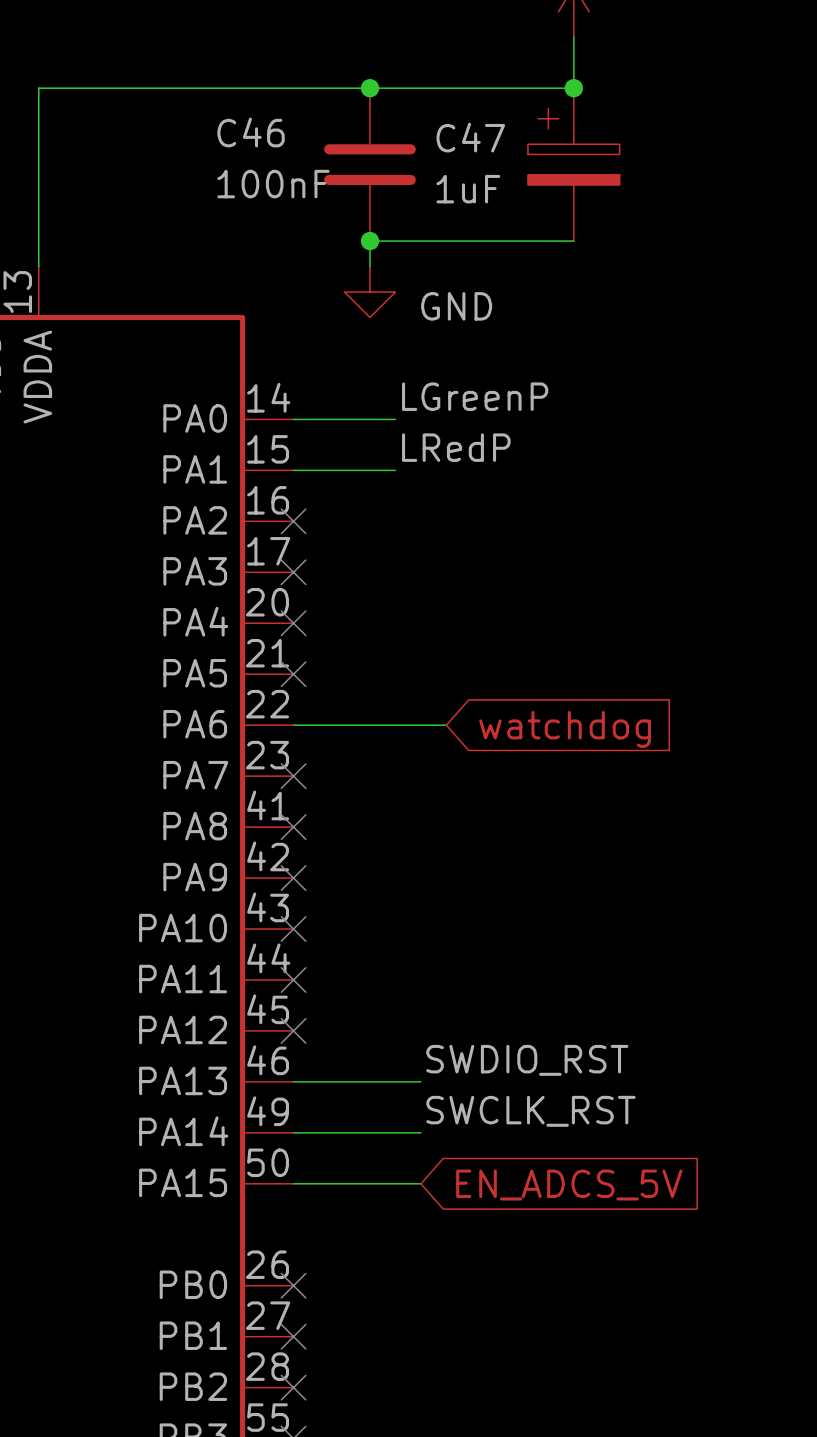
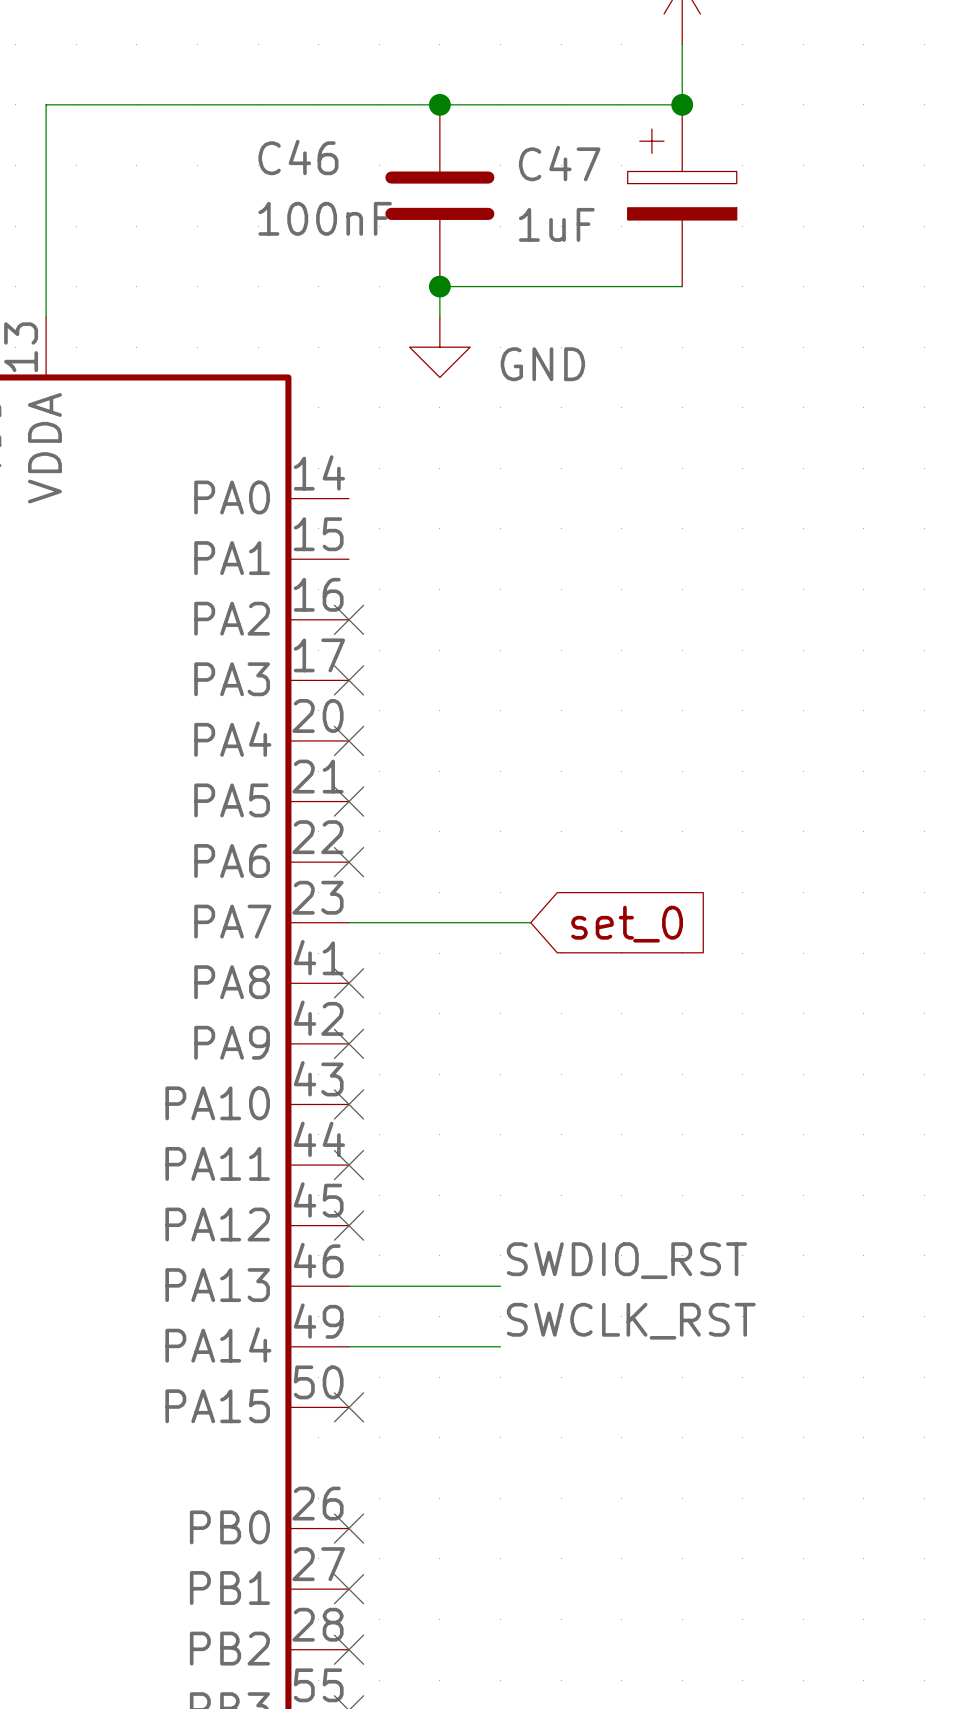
label: LGreenP (475, 396) -> none
wire: (293, 419) (395, 419) -> none
label: LRedP (456, 447) -> none
wire: (293, 470) (395, 470) -> none
wire: (293, 725) (446, 725) -> (349, 922) (530, 922)
global label: watchdog (565, 729) -> none
no-connect mark position: (293, 776) -> (349, 862)
global label: none -> set_0 (627, 924)
wire: (293, 1183) (420, 1183) -> none
no-connect mark: none -> (349, 1407)
global label: EN_ADCS_5V (569, 1185) -> none

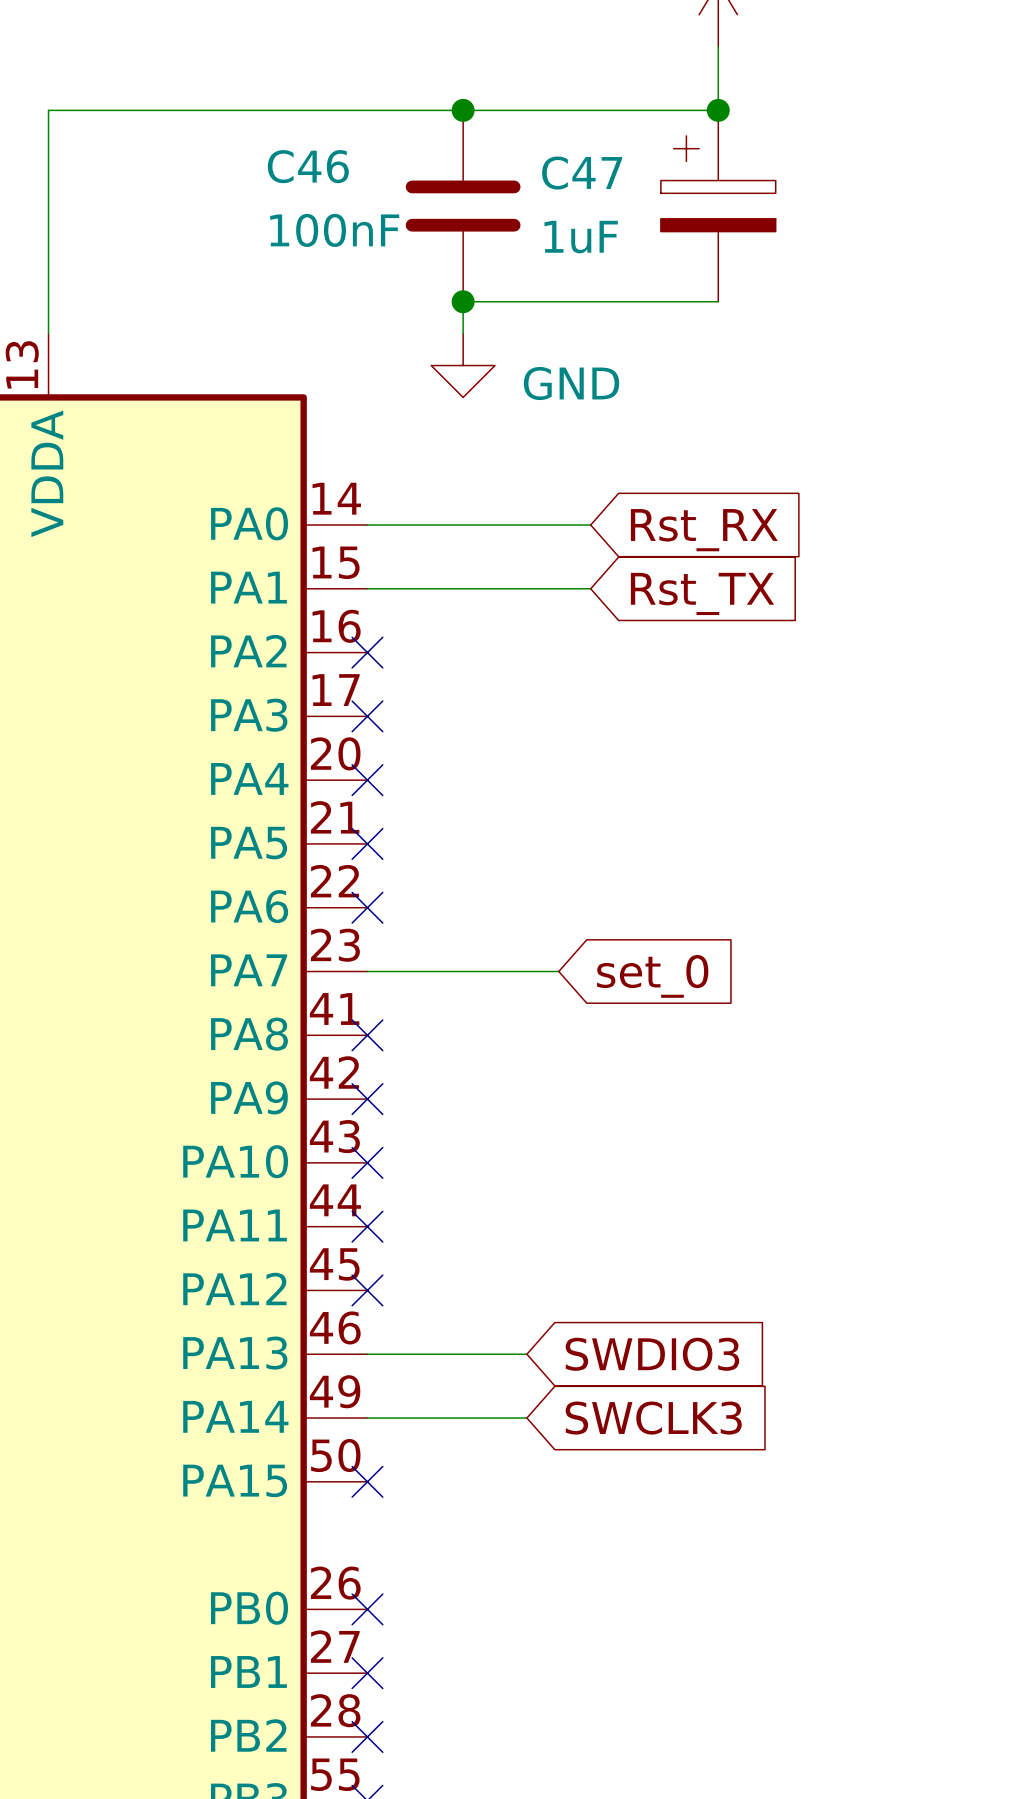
wire: none -> (367, 525) (590, 525)
global label: none -> Rst_RX (704, 530)
wire: none -> (367, 588) (590, 588)
global label: none -> Rst_TX (702, 593)
label: SWDIO_RST (626, 1260) -> none
global label: none -> SWDIO3 (652, 1354)
label: SWCLK_RST (631, 1321) -> none
global label: none -> SWCLK3 (653, 1418)

